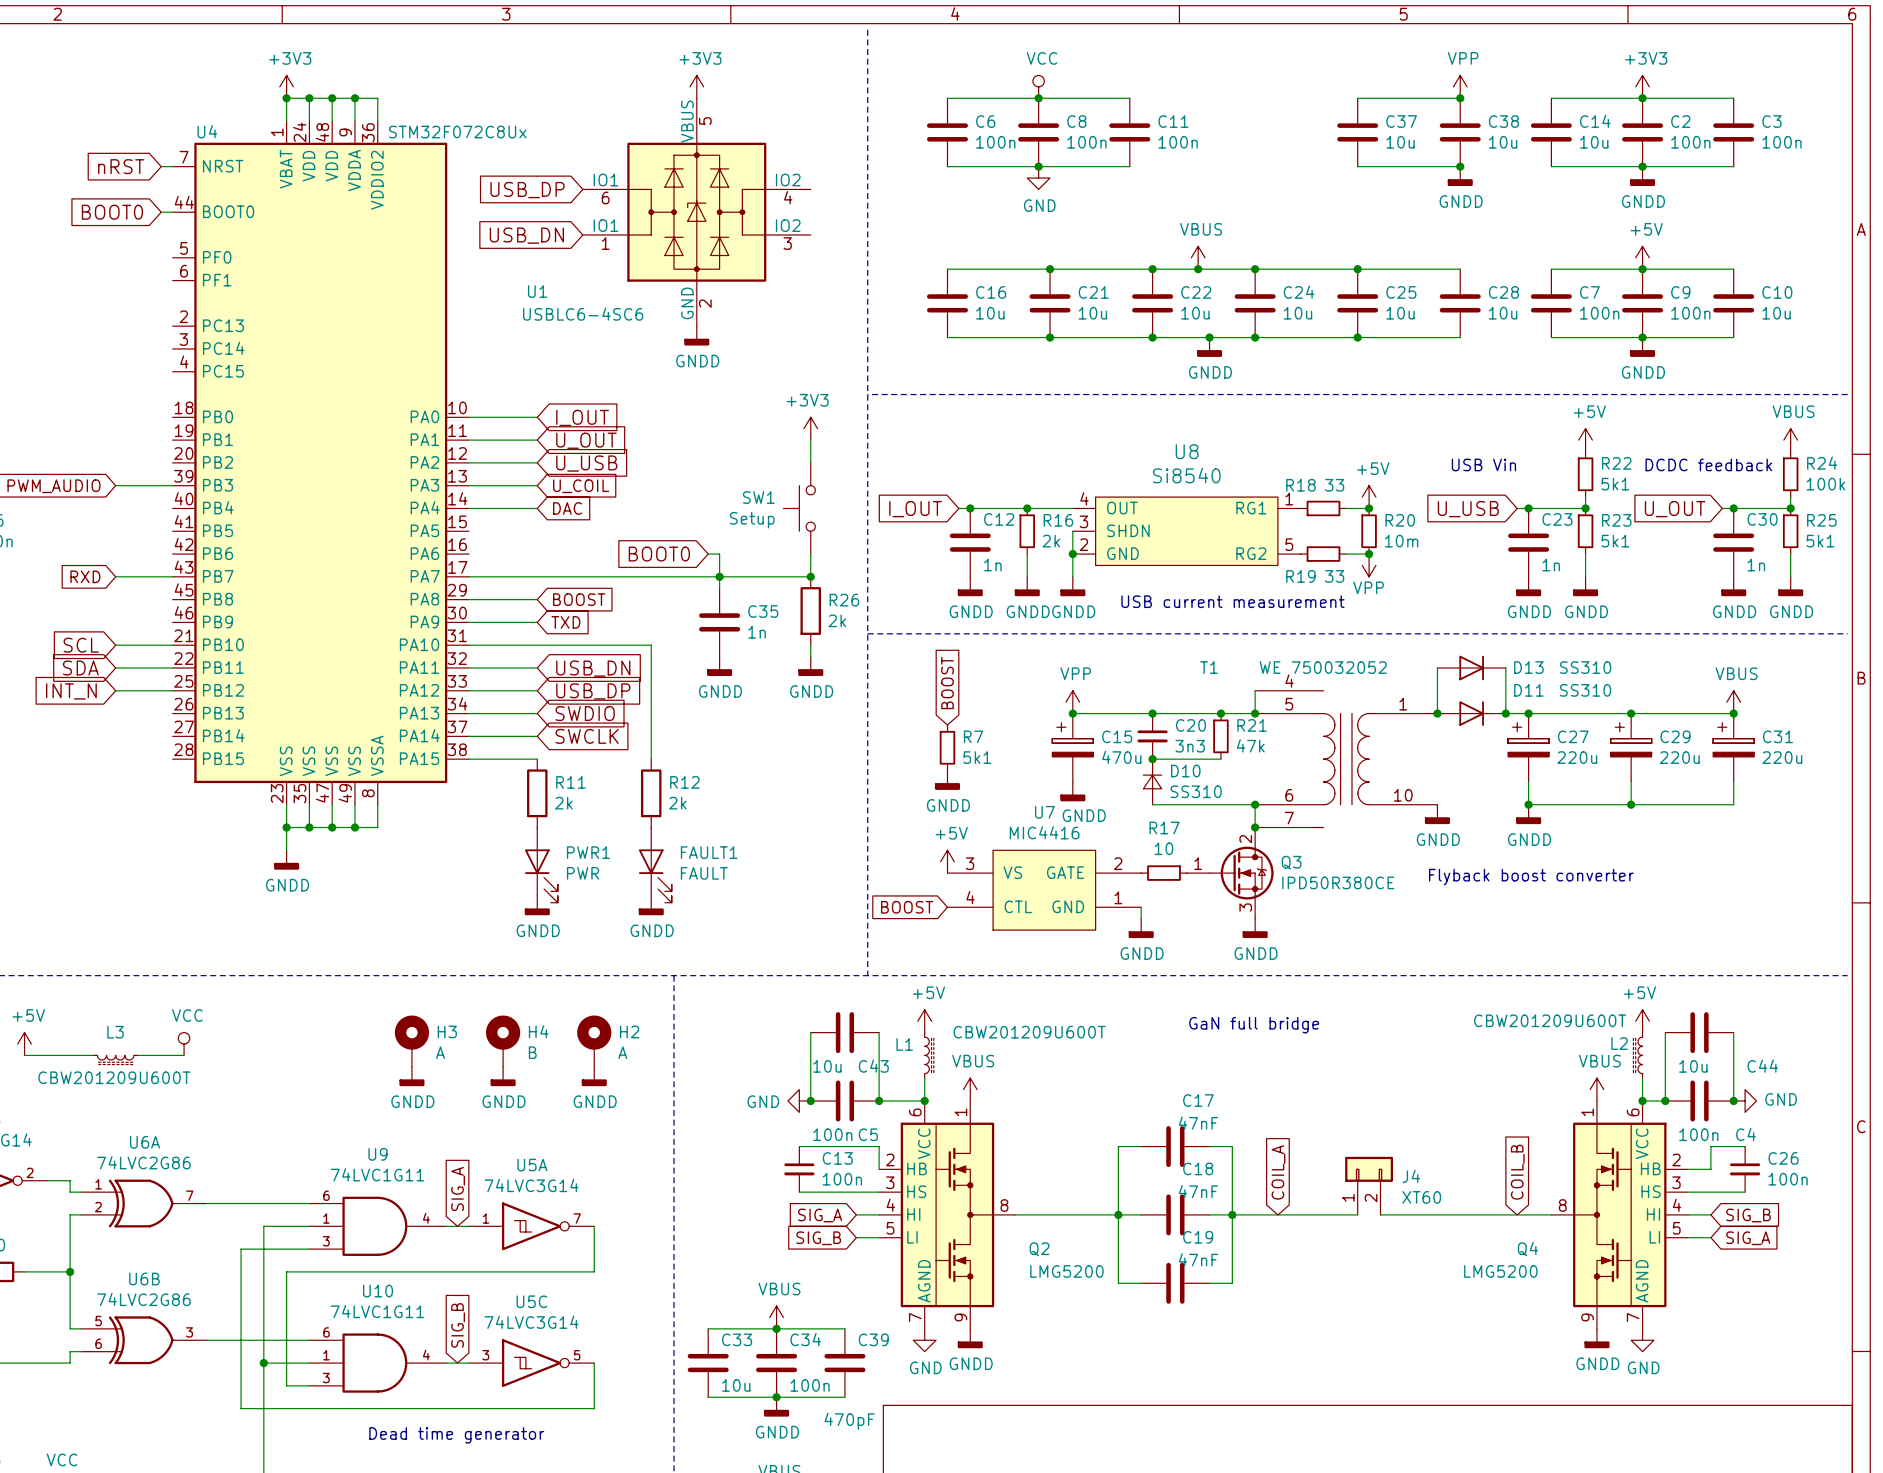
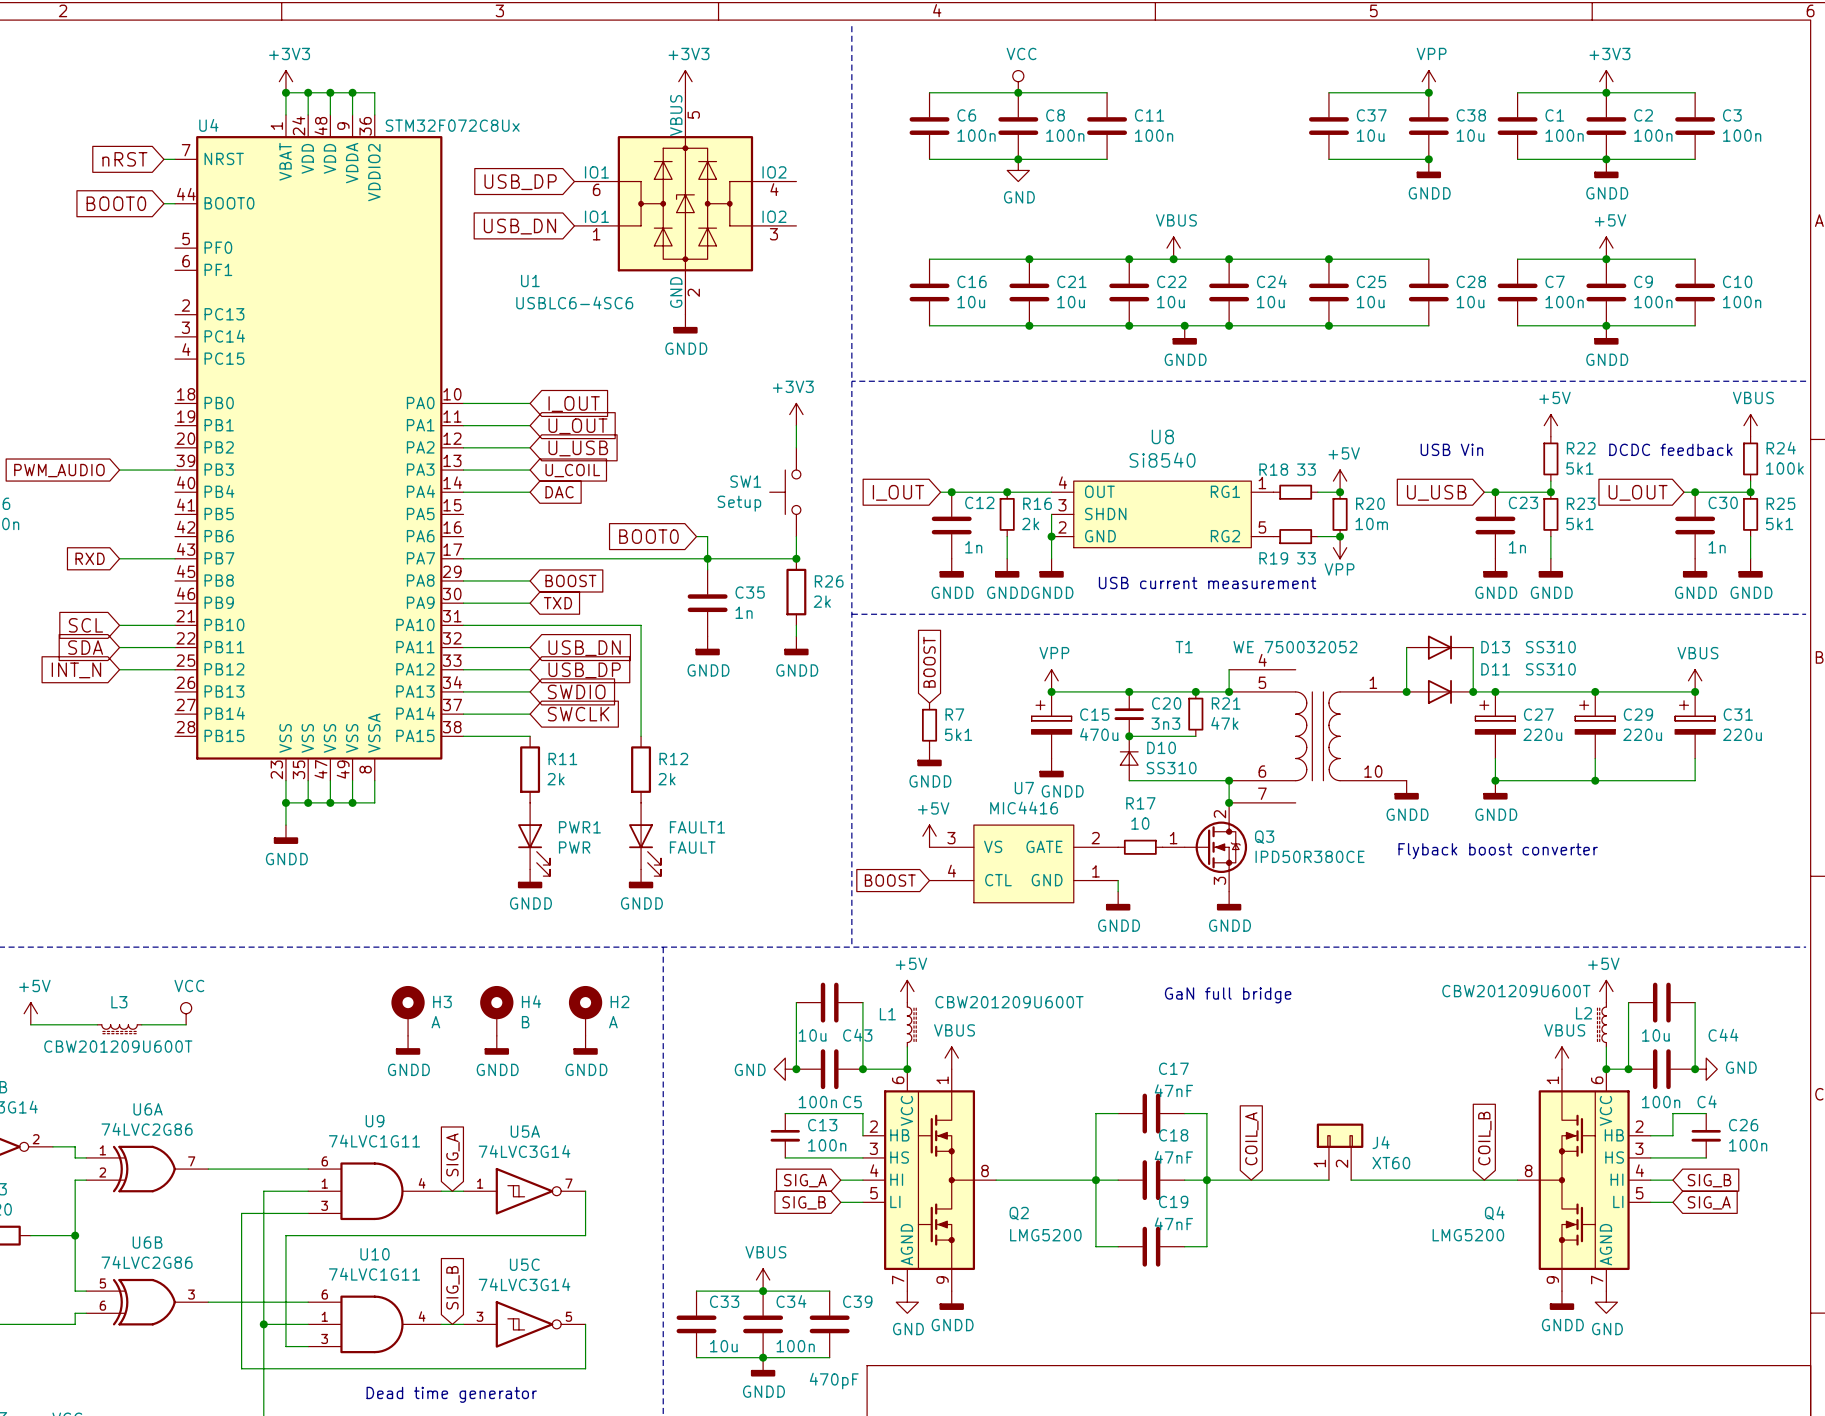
C14 name: C14 (1595, 121) -> C1 (1554, 115)
C14 value: 10u (1594, 142) -> 100n (1564, 135)
C10 value: 10u (1776, 313) -> 100n (1742, 302)

